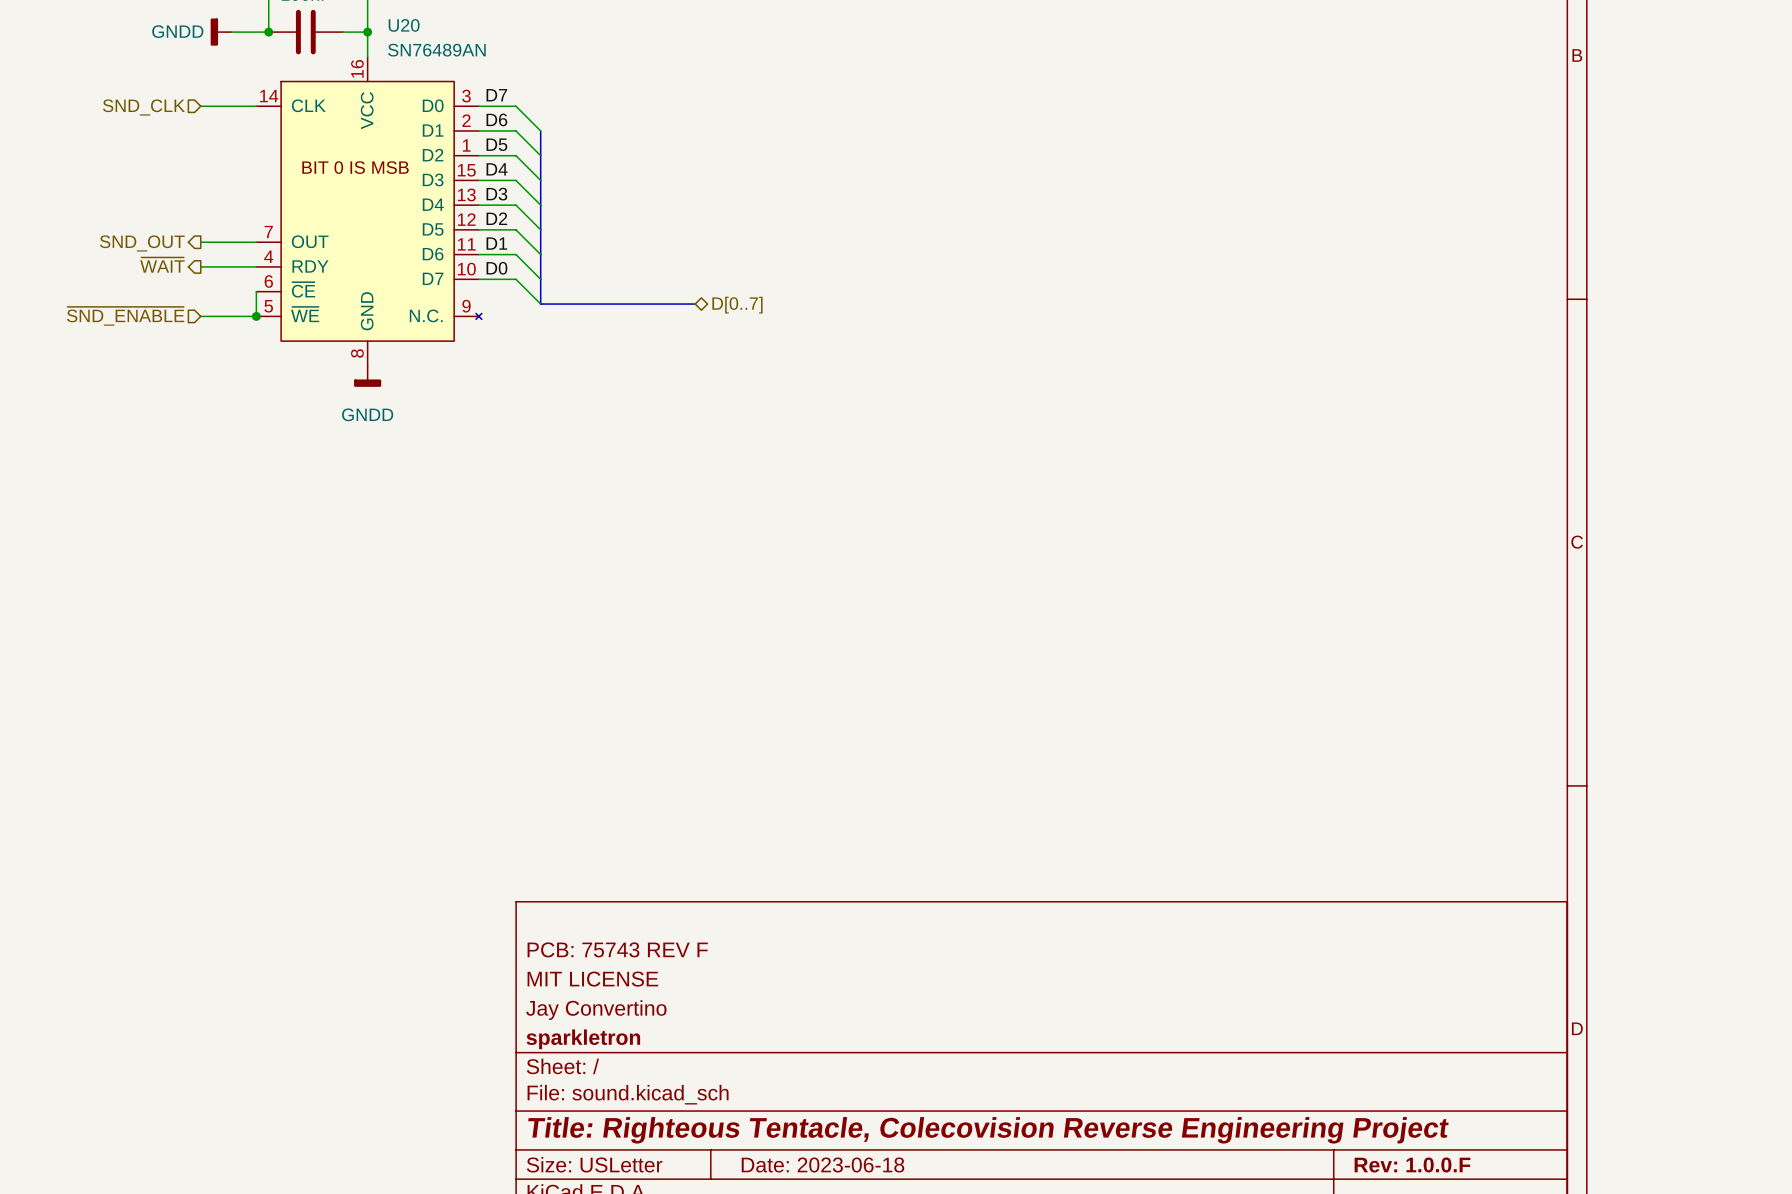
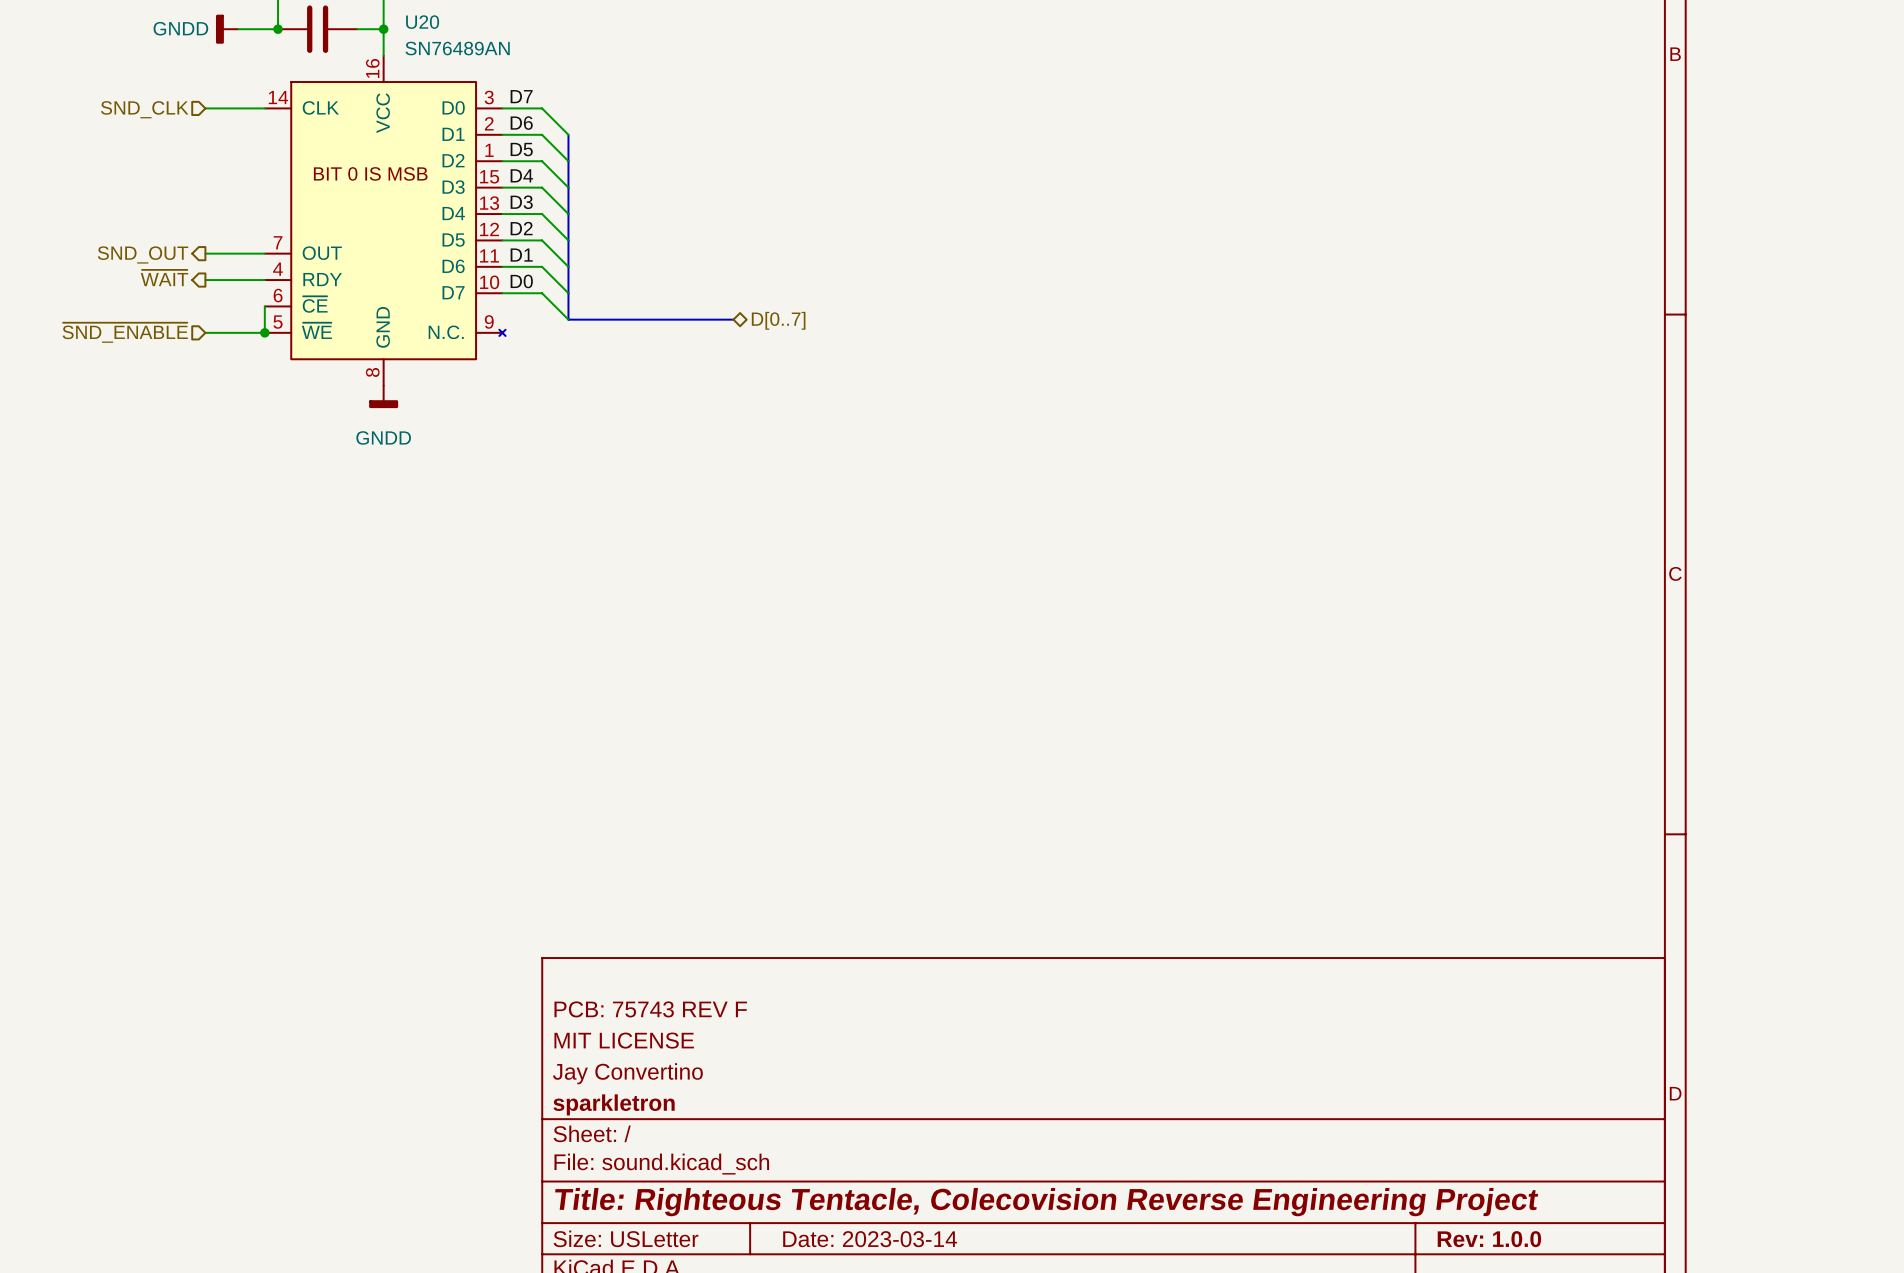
title block: Date: 2023-06-18 (822, 1164) -> Date: 2023-03-14 (870, 1239)
title block: Rev: 1.0.0.F (1412, 1164) -> Rev: 1.0.0 (1489, 1239)

